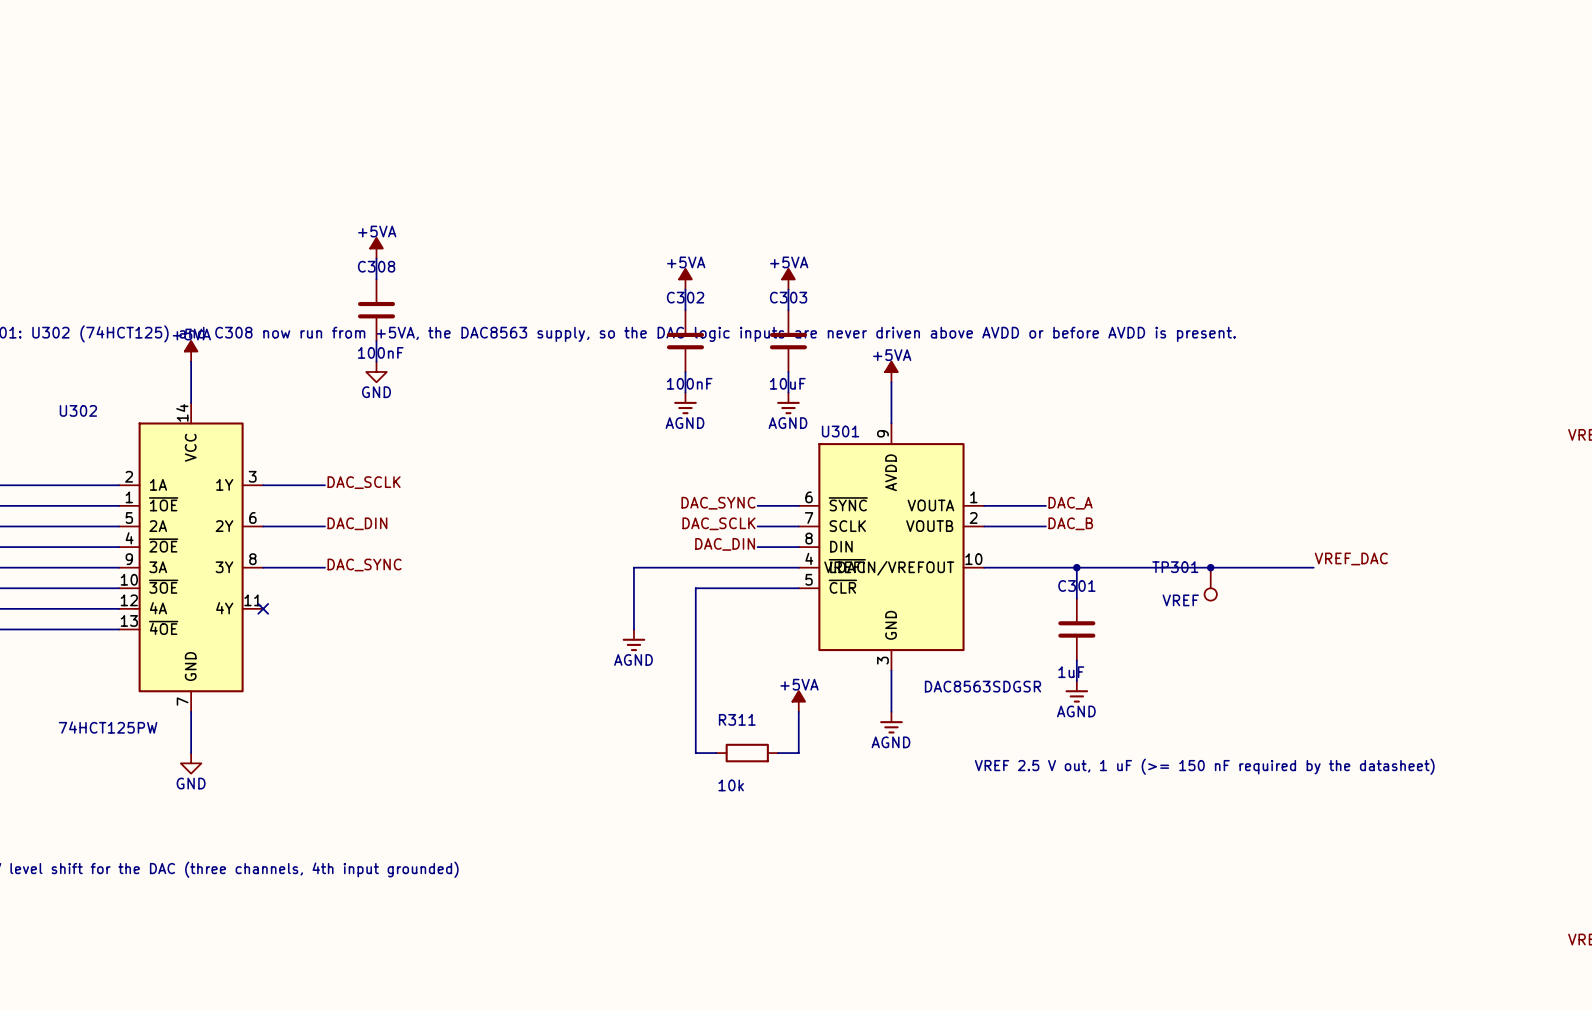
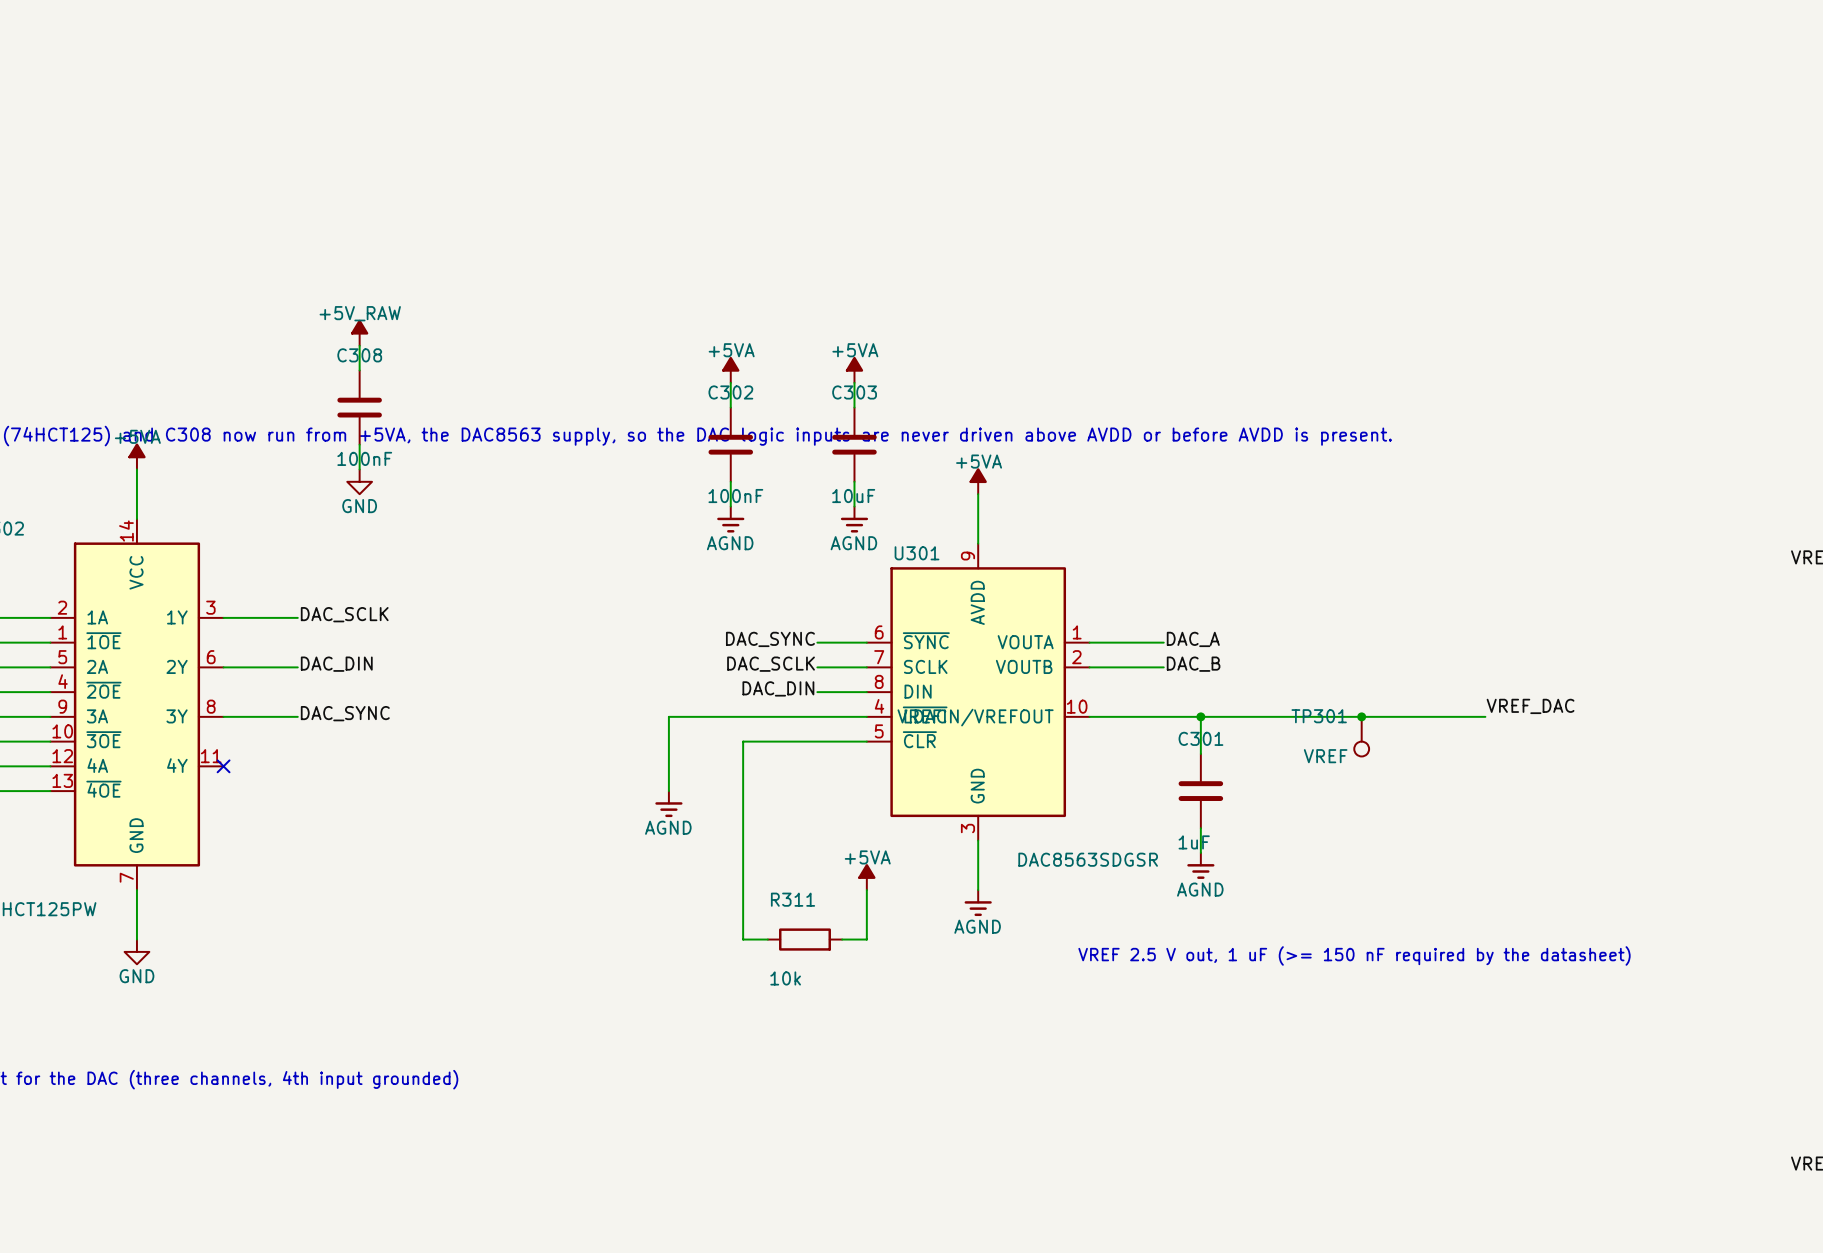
power symbol: +5VA (376, 247) -> +5V_RAW (359, 332)

